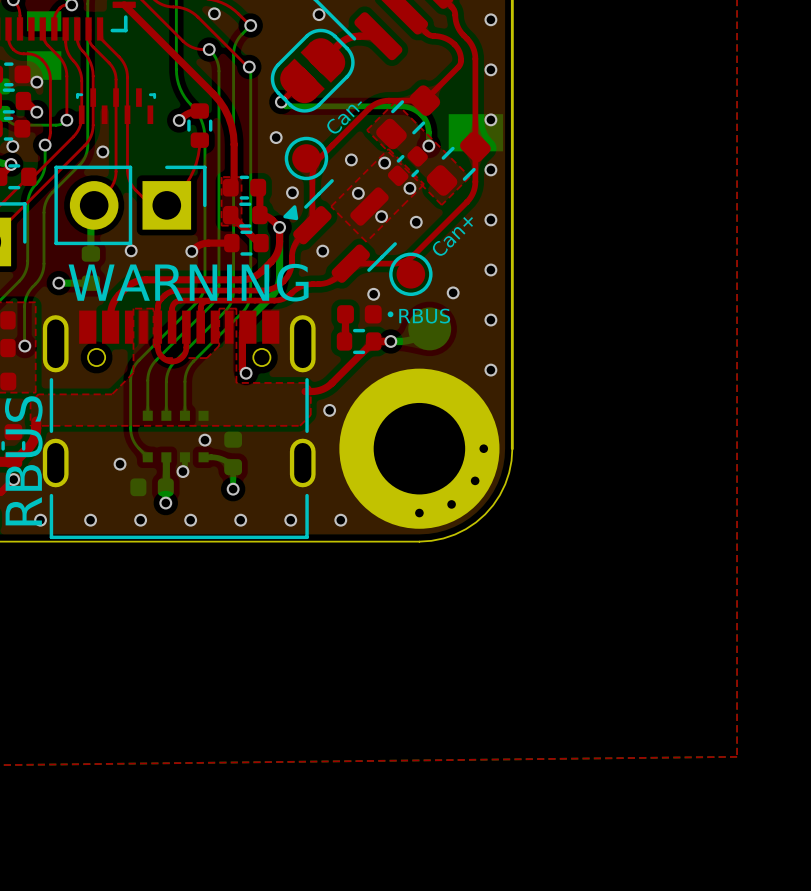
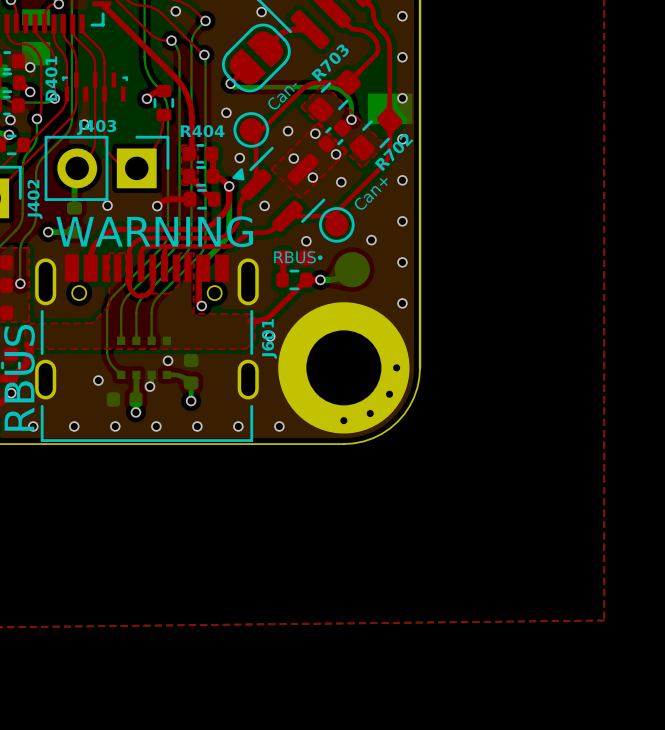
R703 name: none -> R703 (330, 63)
D401 name: none -> D401 (51, 78)
J403 name: none -> J403 (96, 127)
R404 name: none -> R404 (202, 131)
R702 name: none -> R702 (394, 152)
J402 name: none -> J402 (35, 199)
part text position: RBUS (424, 316) -> RBUS (294, 257)
J601 name: none -> J601 (269, 338)

